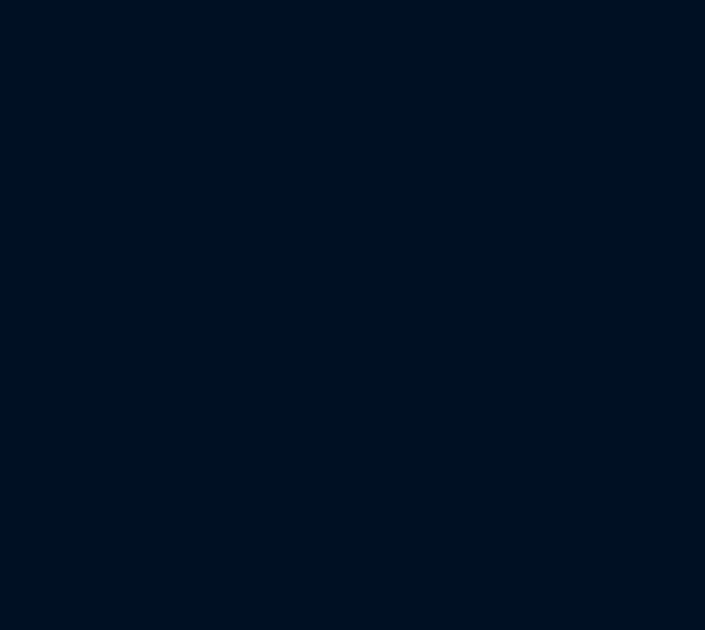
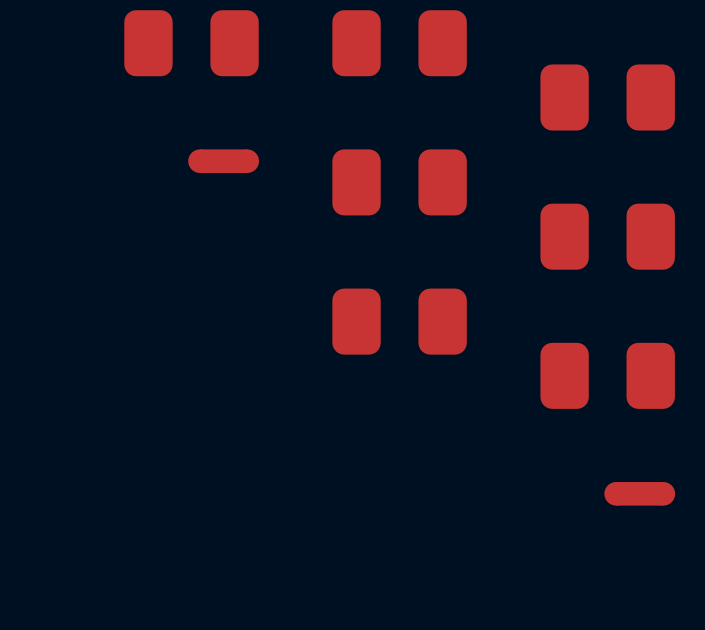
part: none -> (191, 43)
part: none -> (399, 43)
part: none -> (607, 97)
part: none -> (223, 161)
part: none -> (399, 182)
part: none -> (607, 236)
part: none -> (399, 321)
part: none -> (607, 375)
part: none -> (639, 493)

